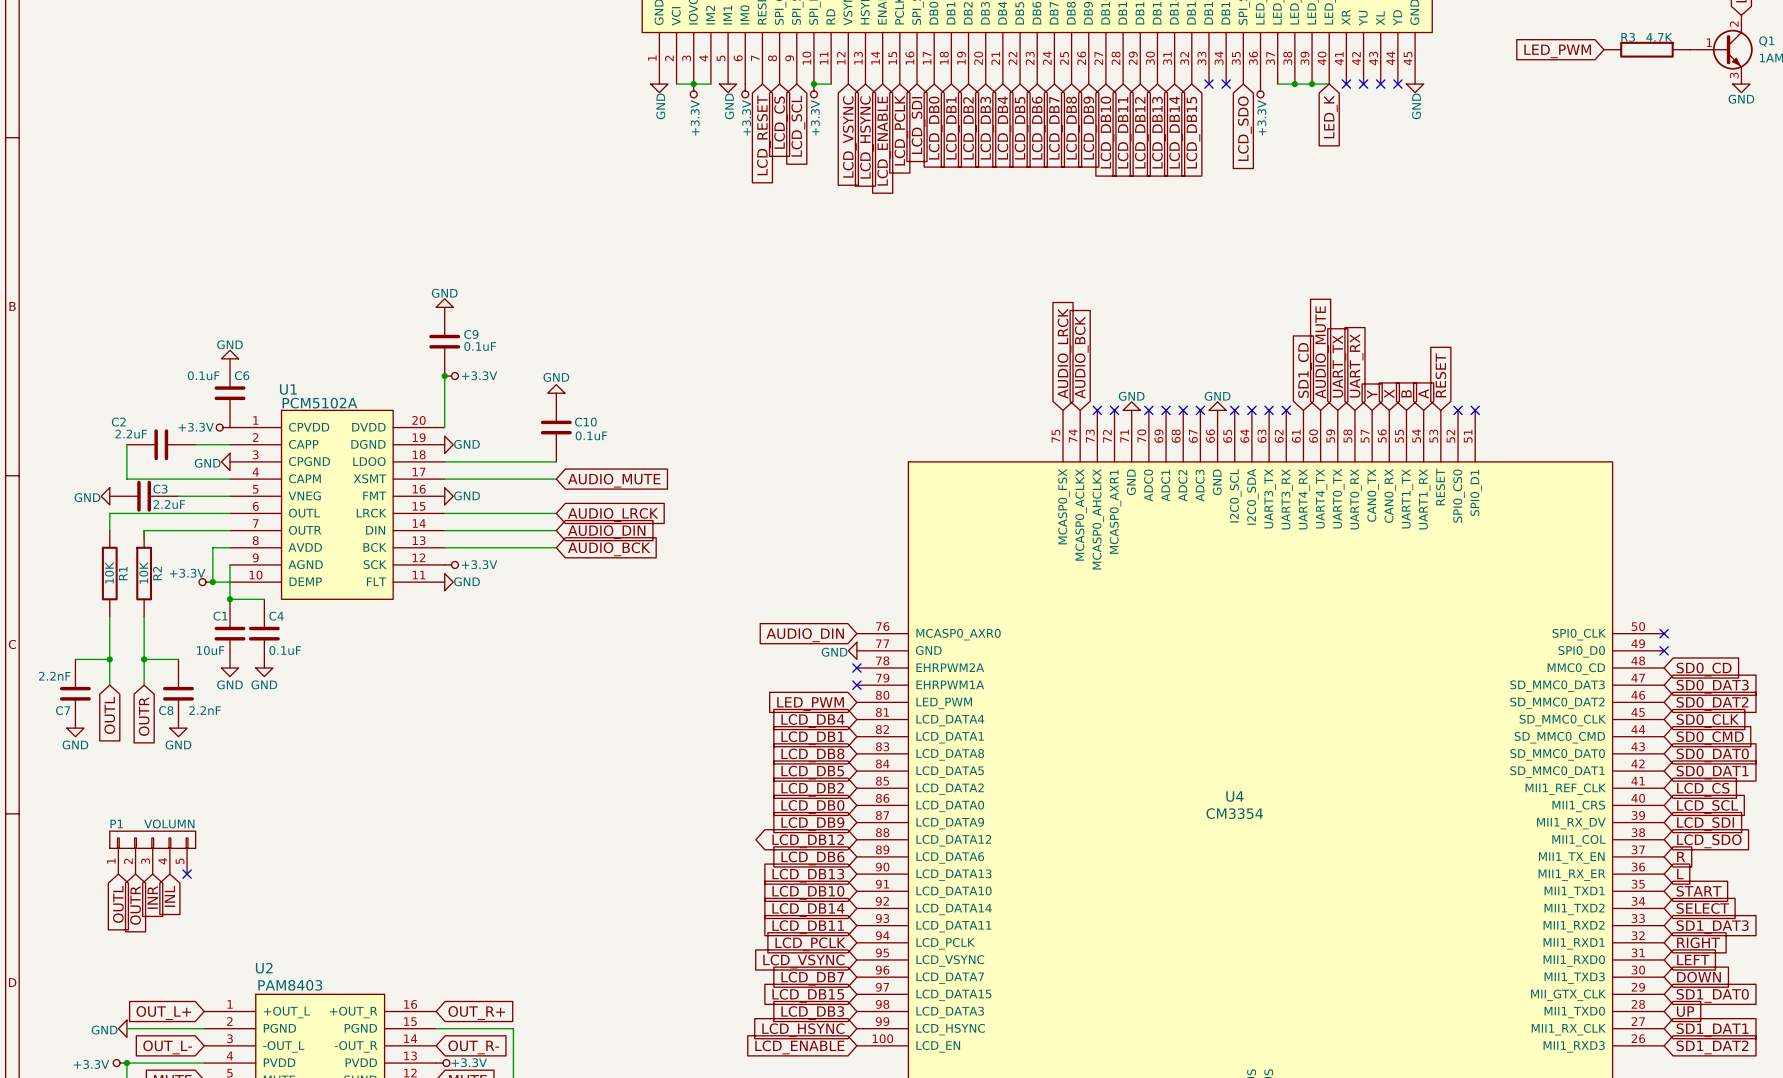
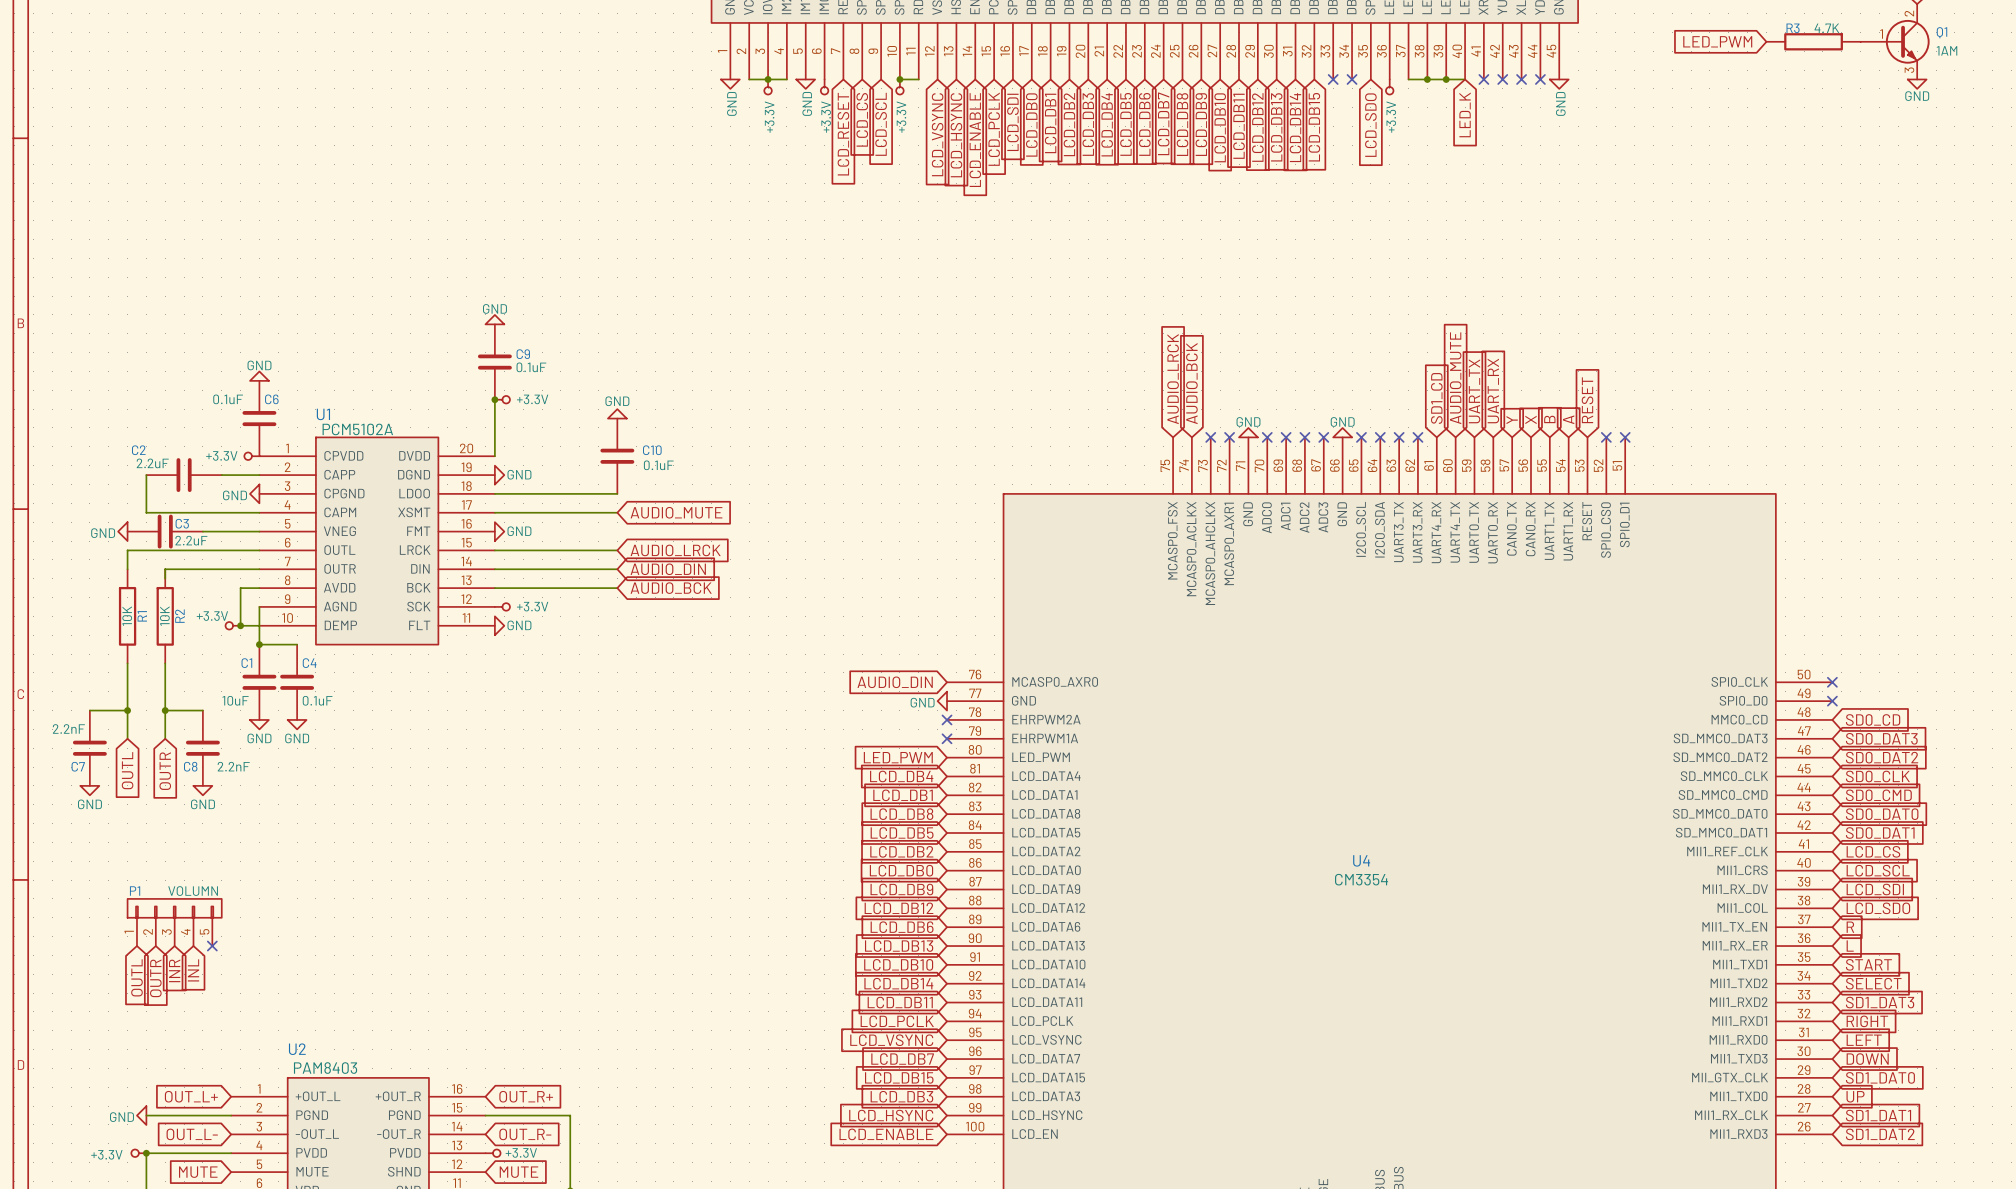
global label shape: bidirectional (808, 841) -> input (899, 908)

